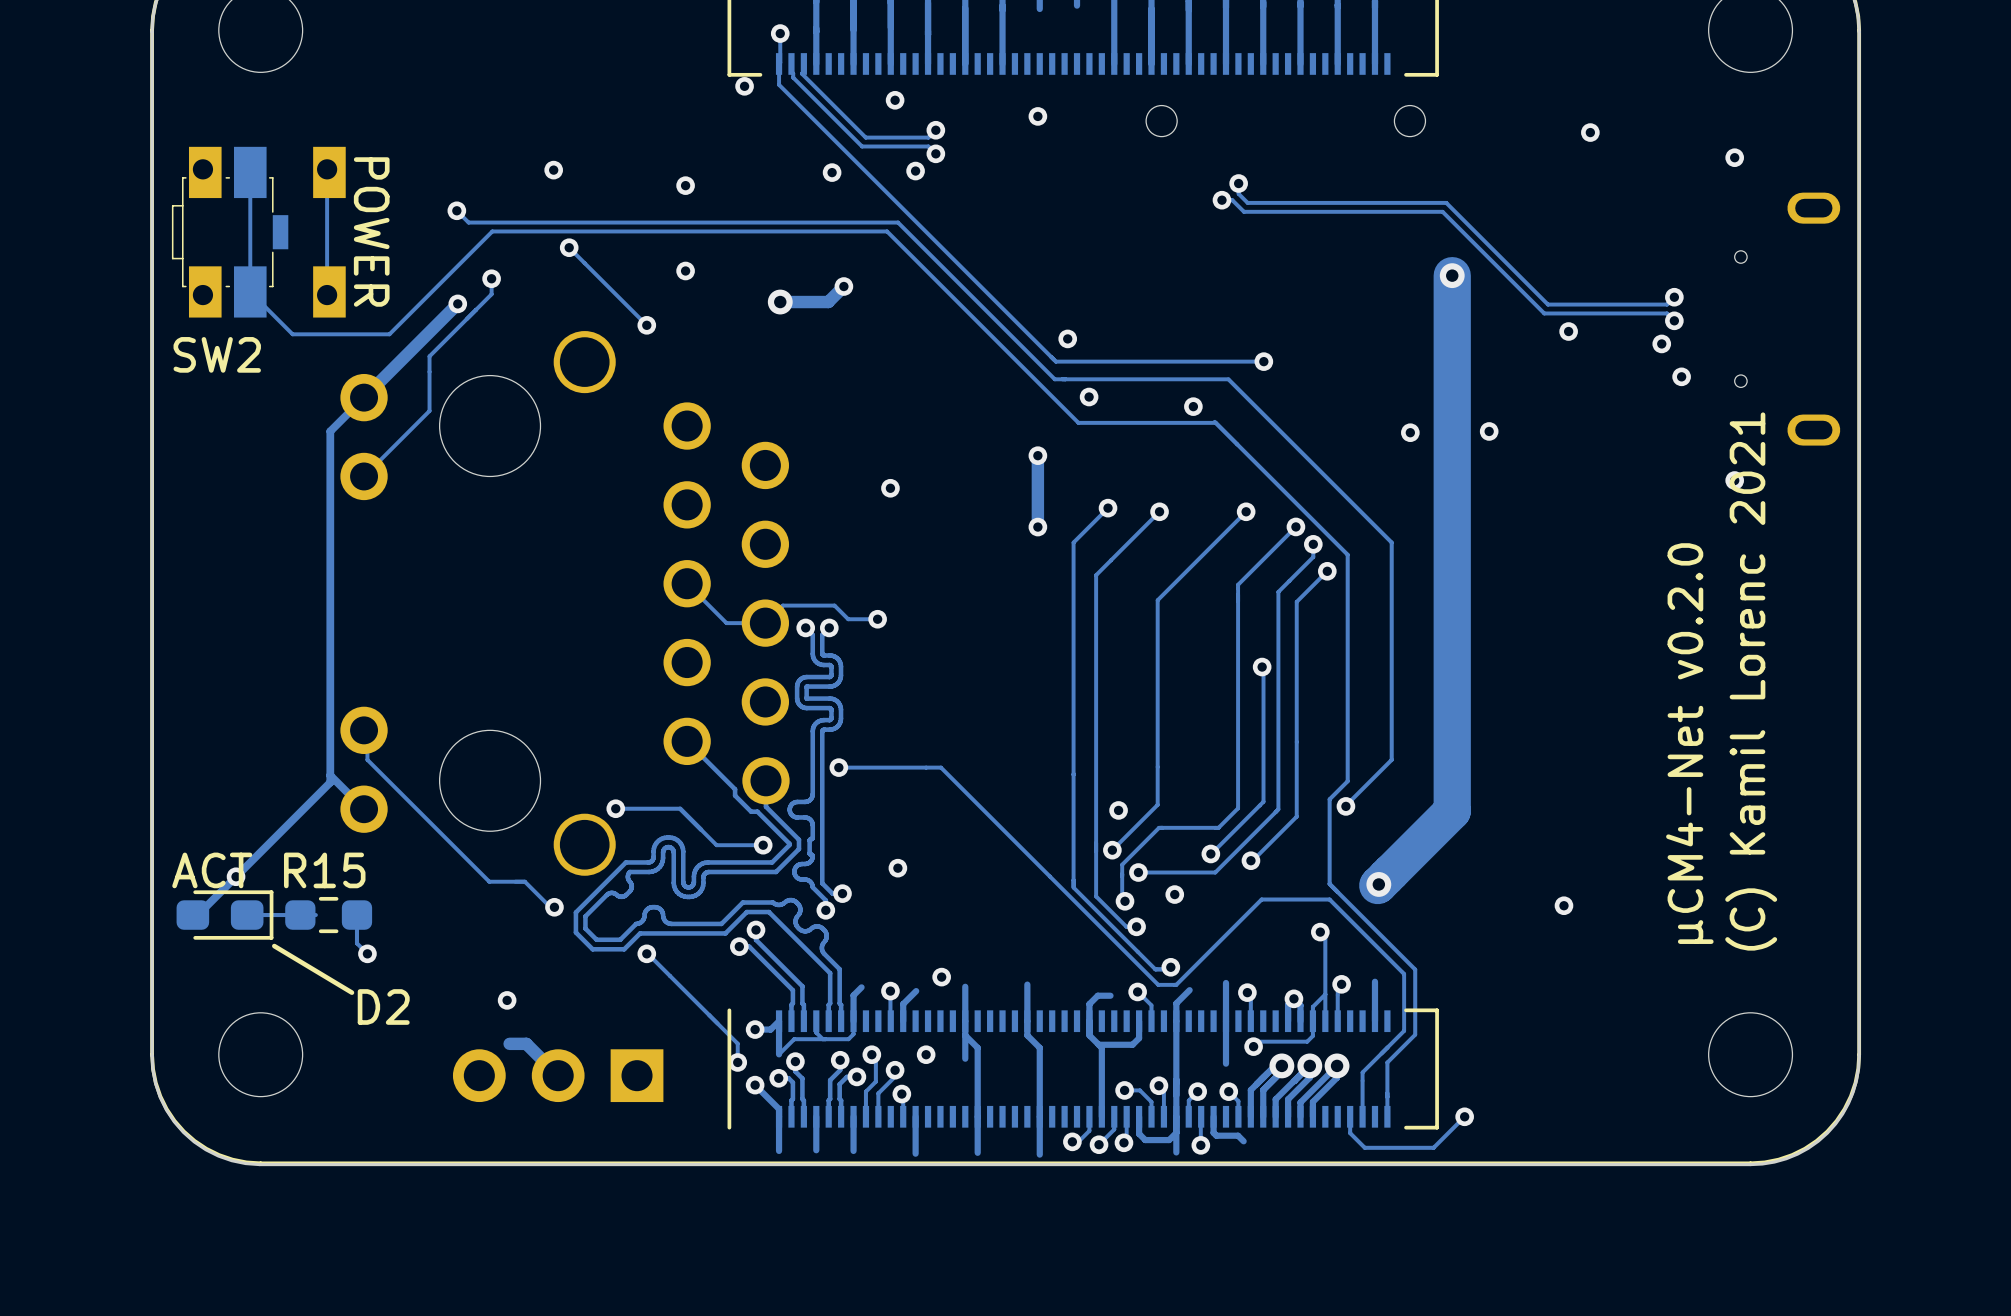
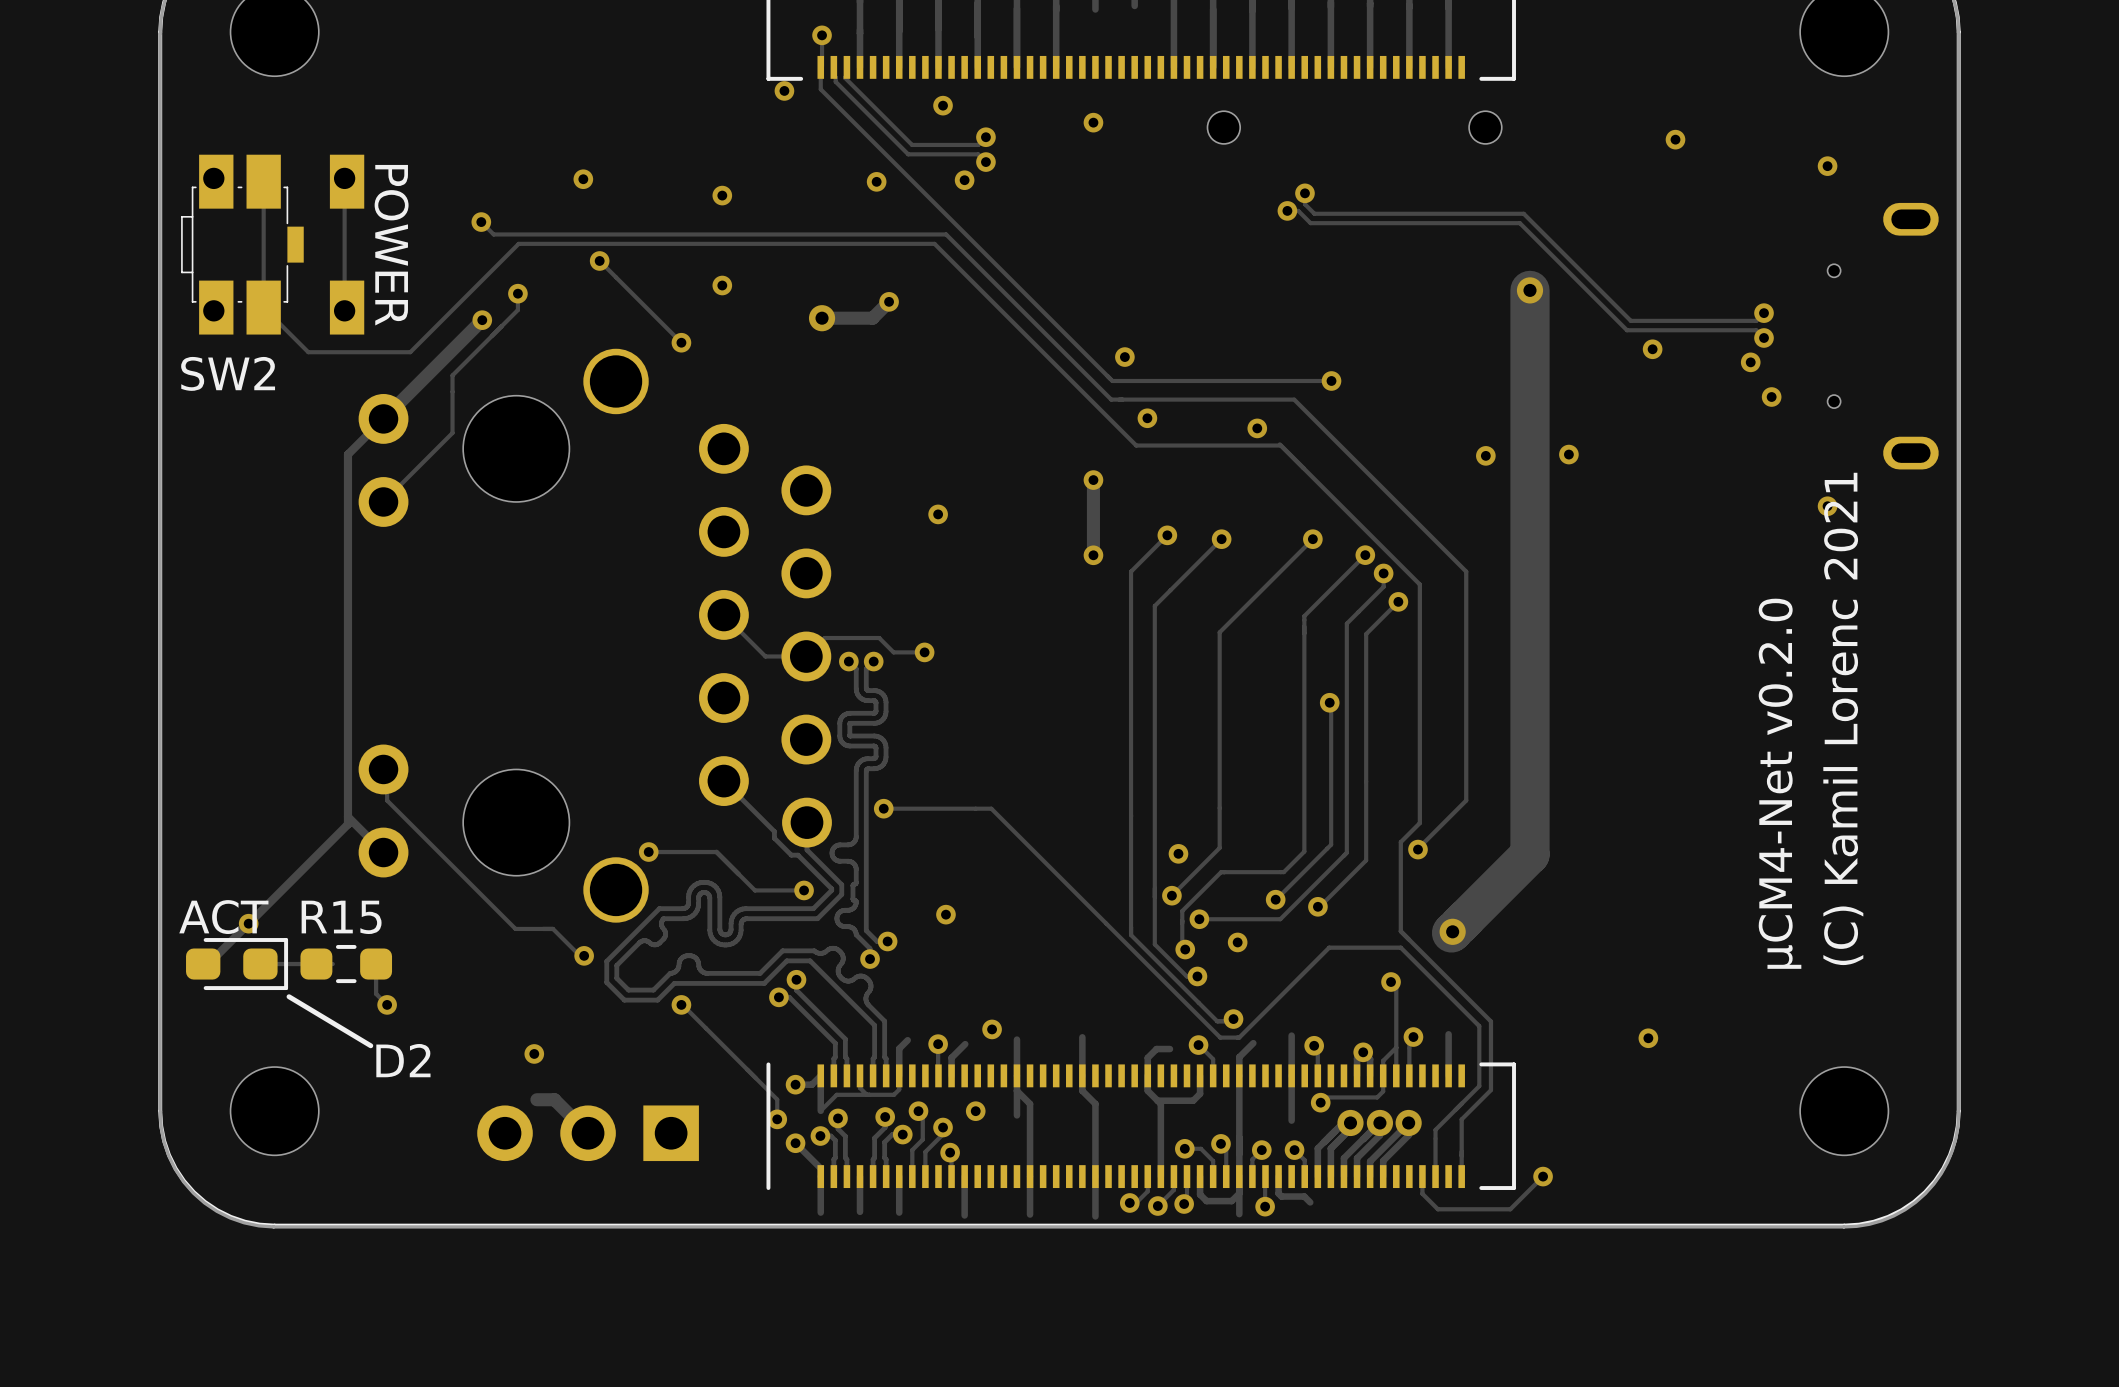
via position: (1563, 905) -> (1648, 1038)

